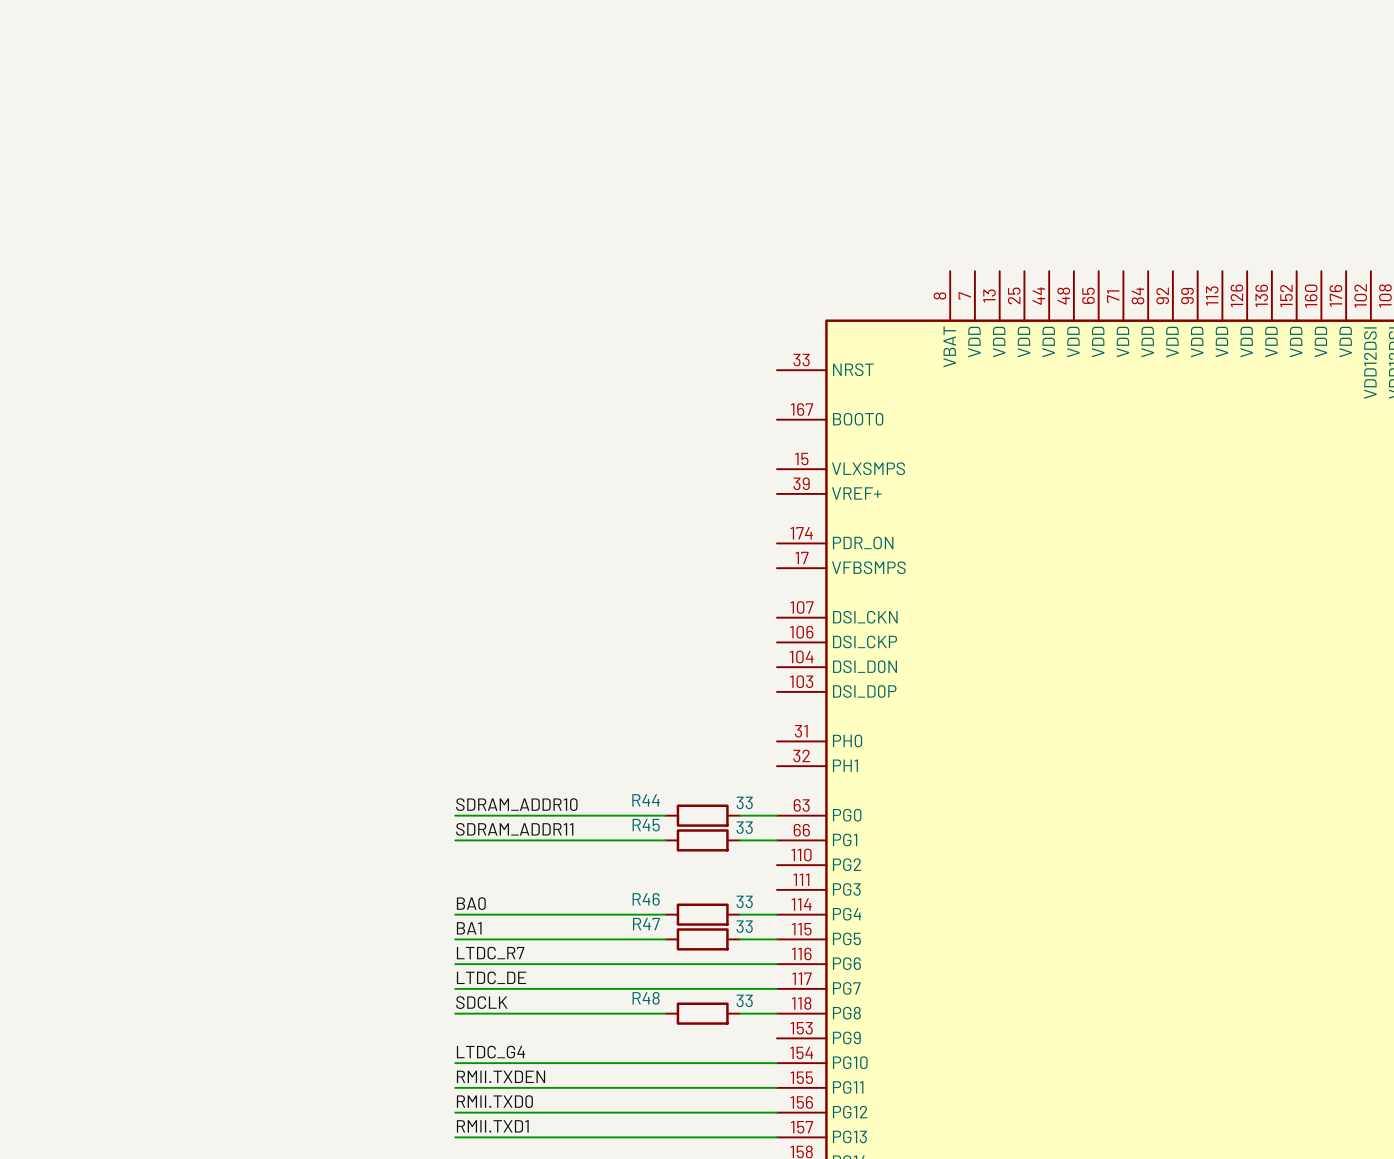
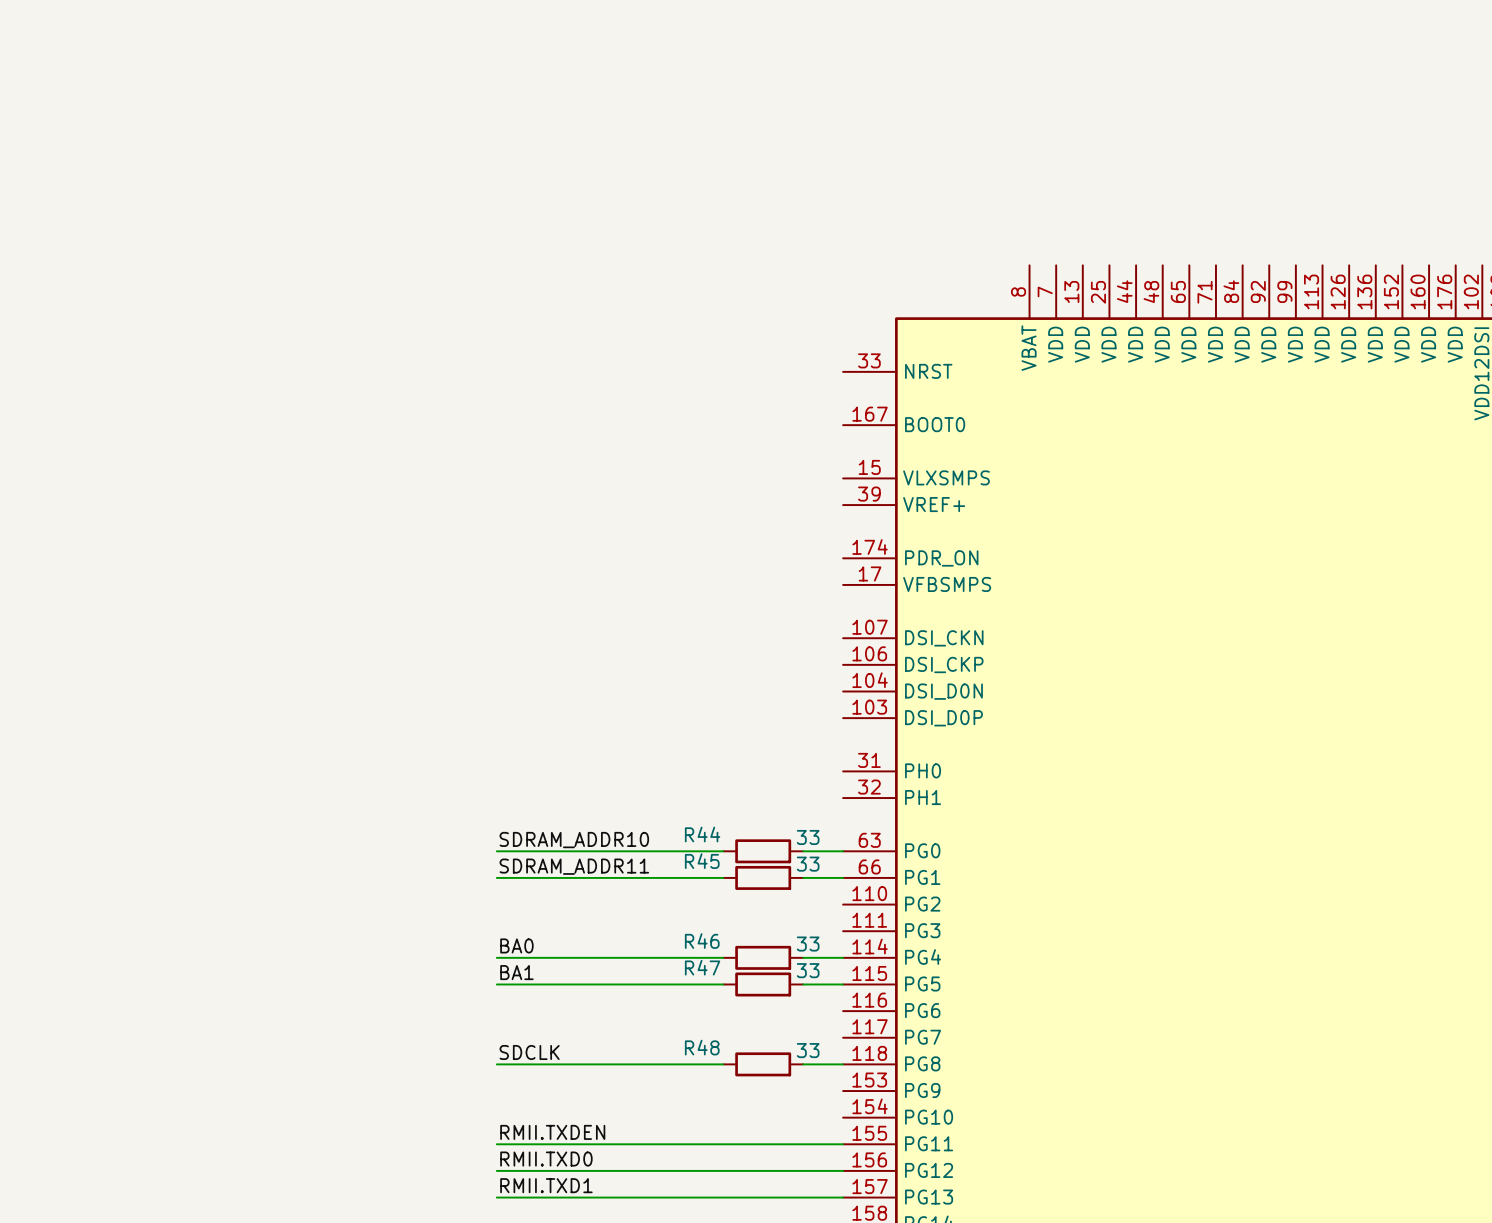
label: LTDC_R7 (490, 953) -> none
wire: (455, 964) (776, 964) -> none
label: LTDC_DE (491, 977) -> none
wire: (455, 988) (776, 988) -> none
label: LTDC_G4 (490, 1052) -> none
wire: (455, 1063) (776, 1063) -> none

